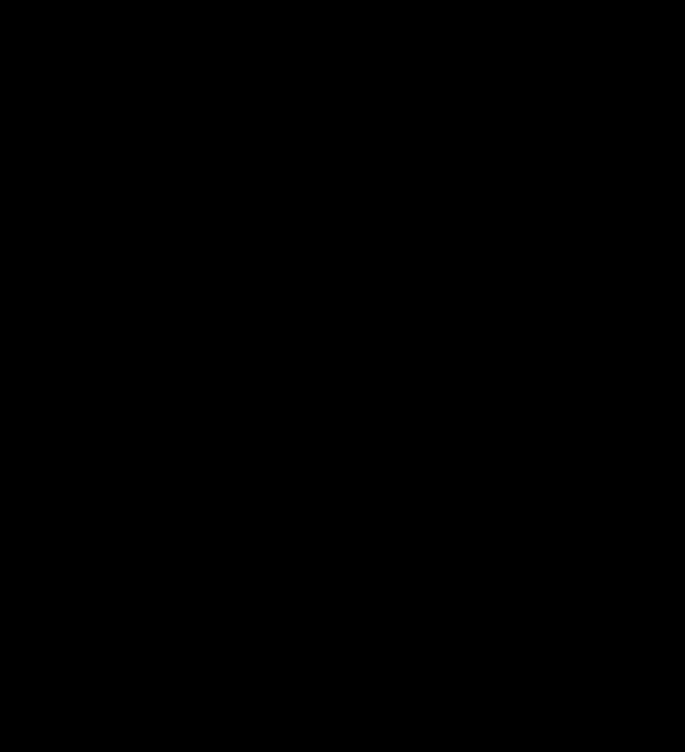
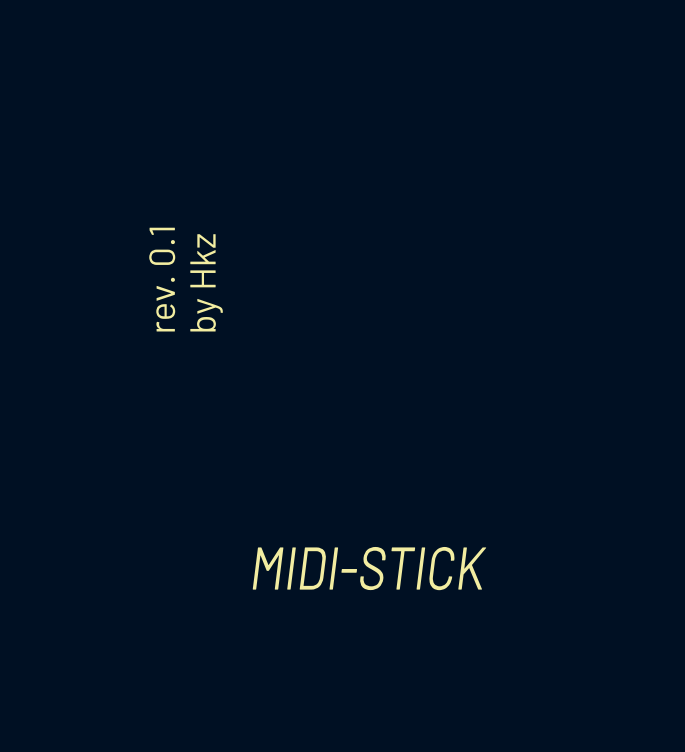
text: none -> rev. 0.1 (162, 279)
text: none -> by Hkz (206, 282)
text: none -> MIDI-STICK (369, 568)

